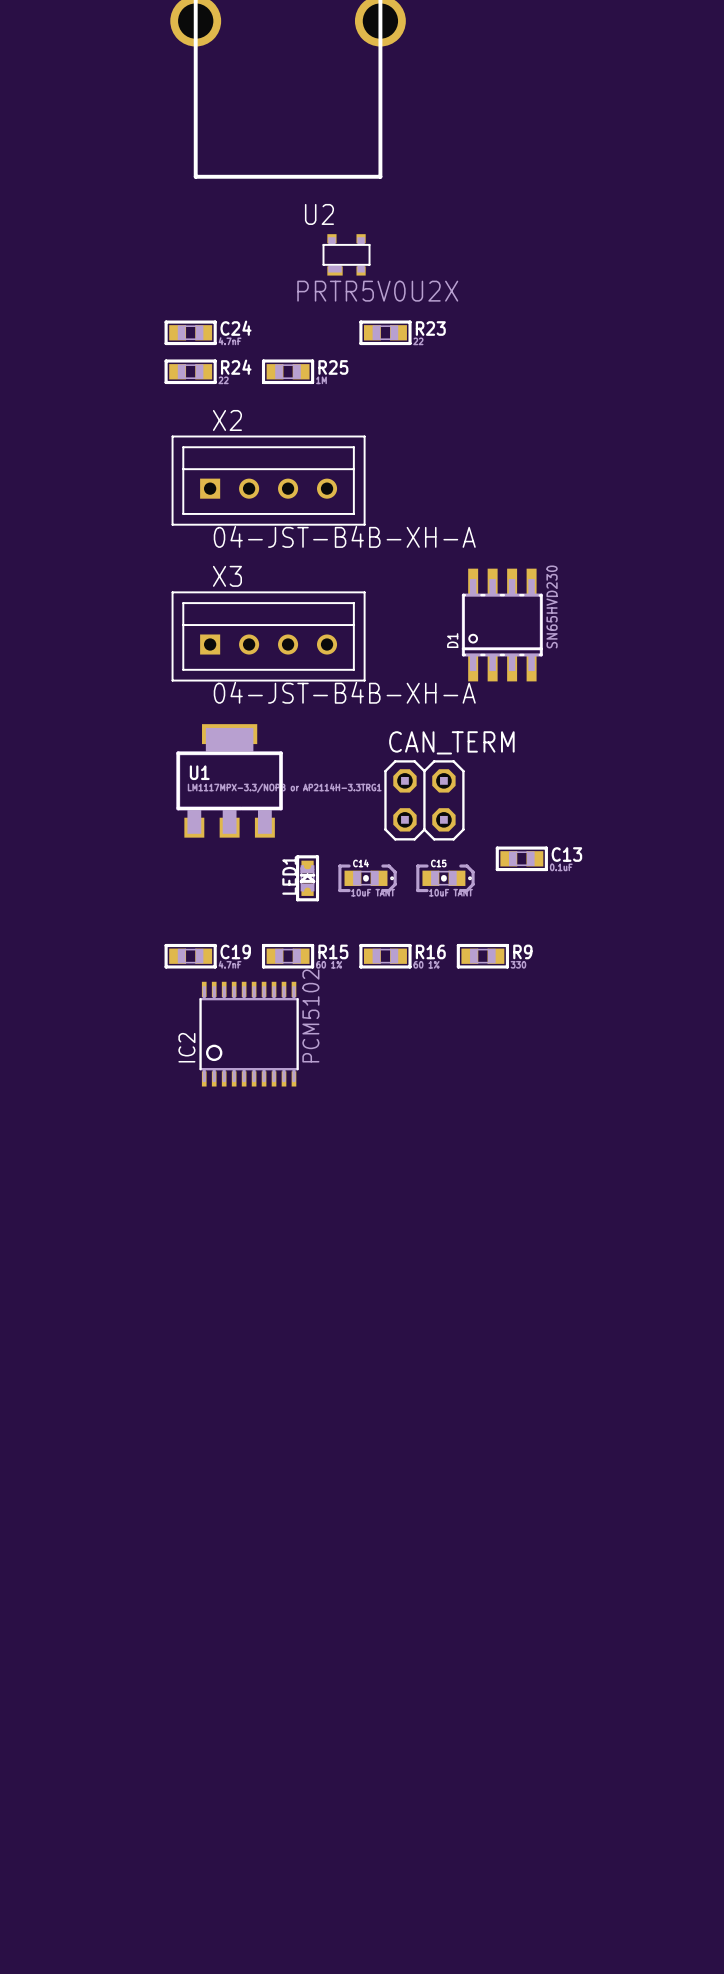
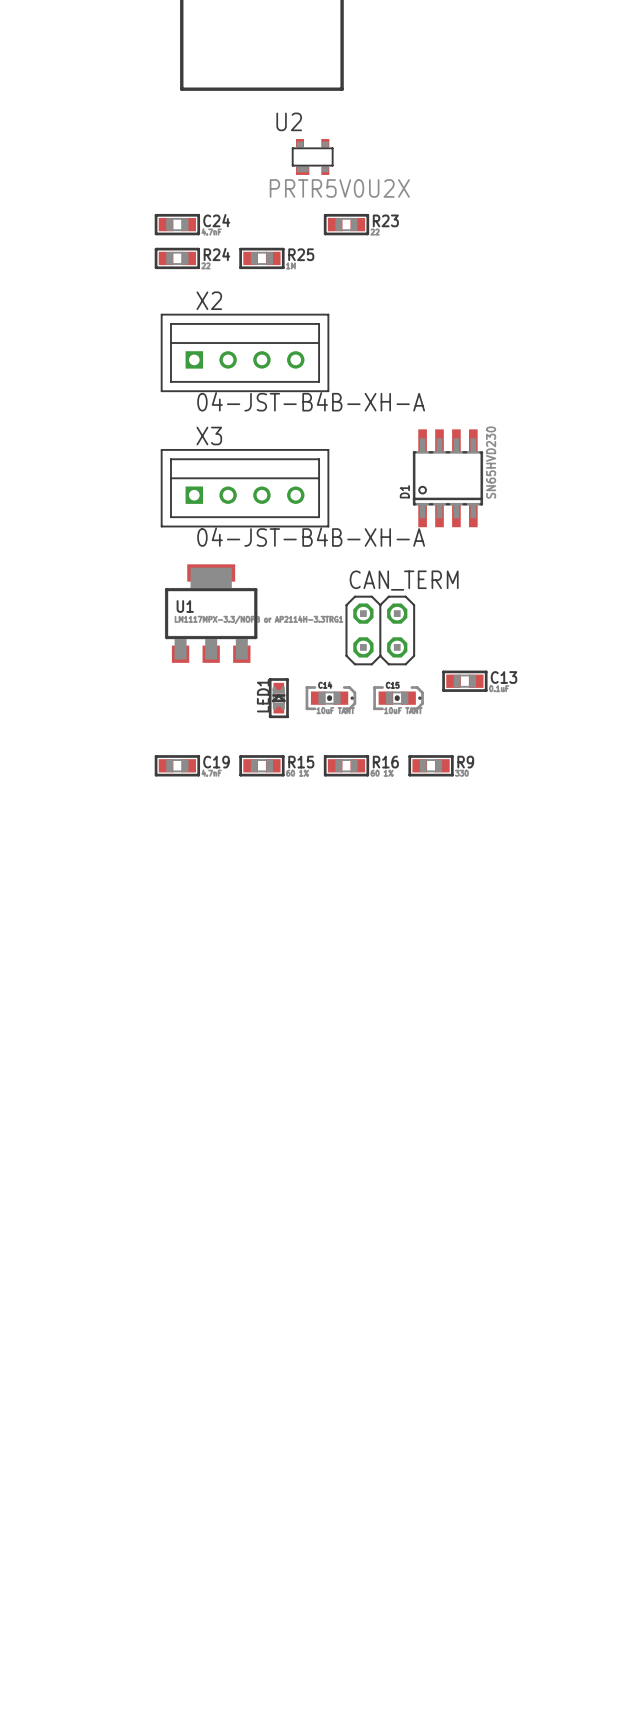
IC2: PCM5102 (249, 1034) -> none

